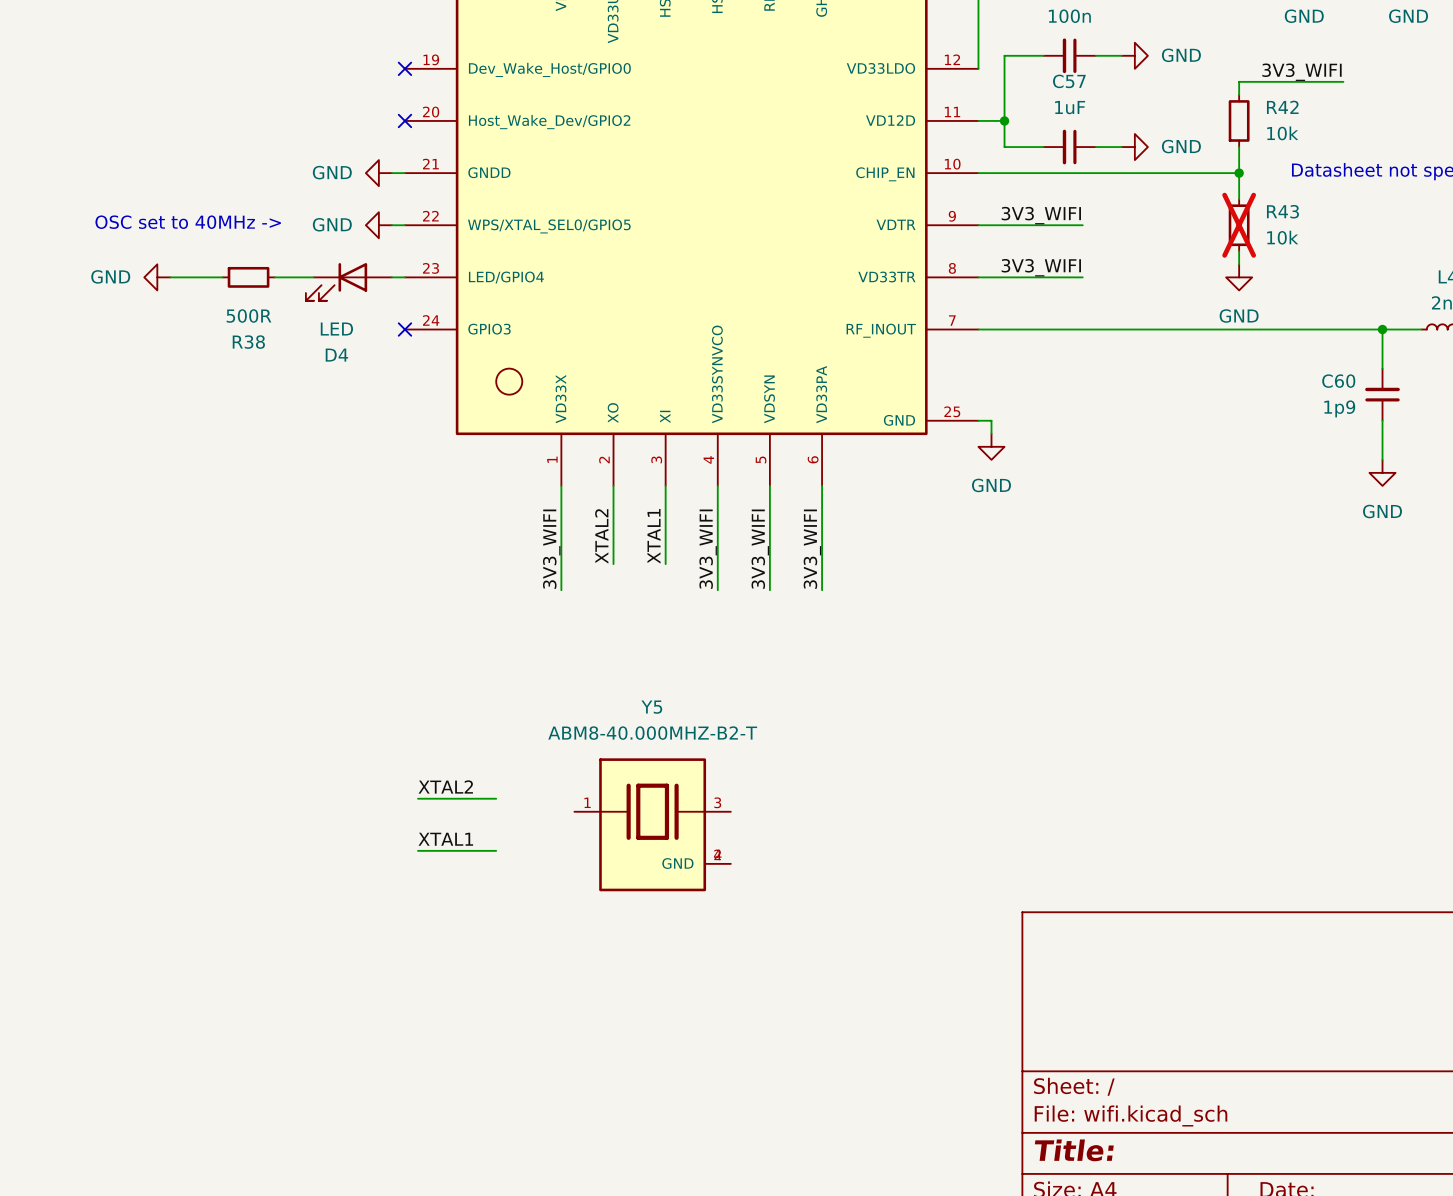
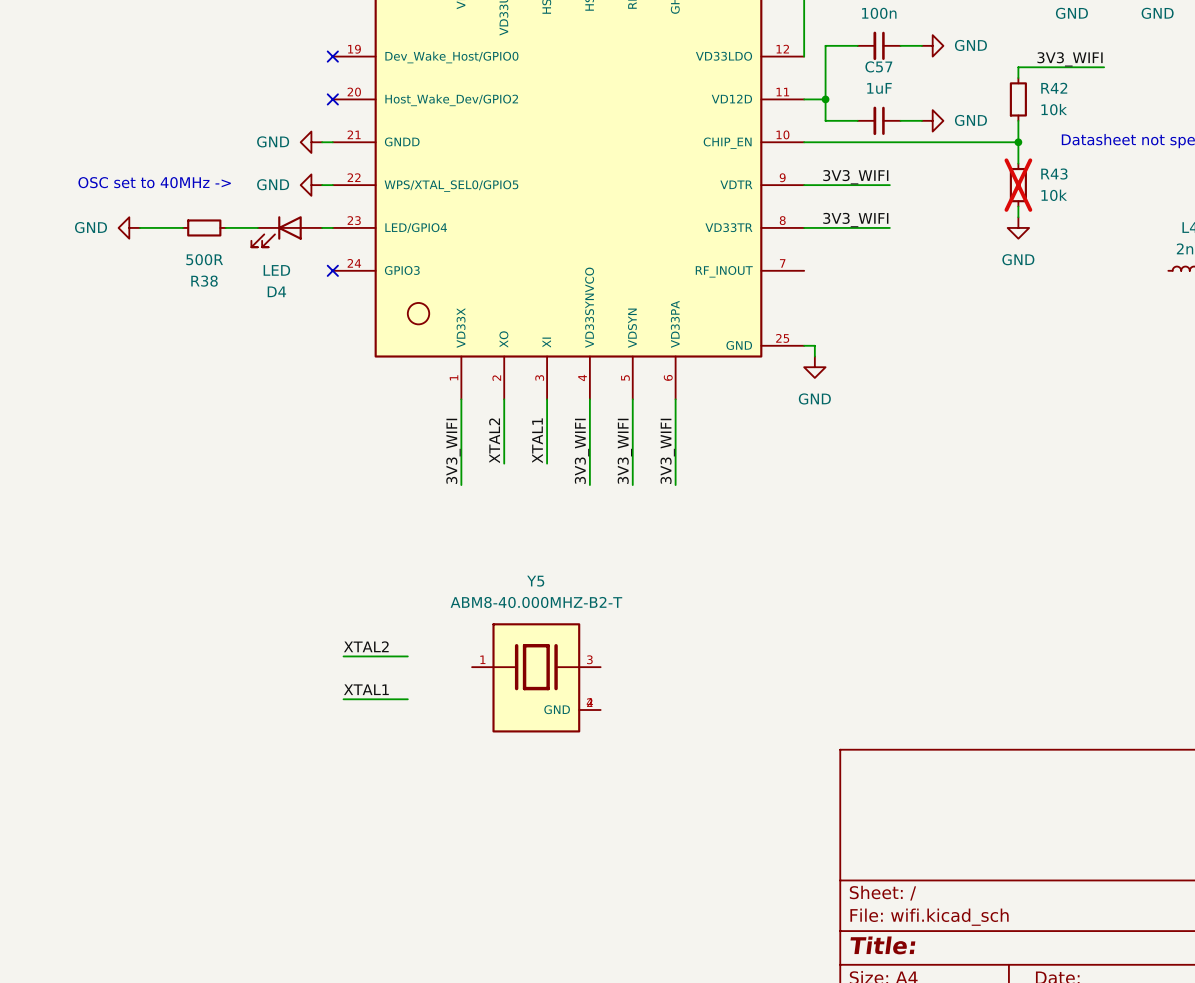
wire: (978, 329) (1421, 329) -> none
wire: (1382, 329) (1382, 368) -> none
junction: (1382, 329) -> none
C60: (1382, 394) -> none
wire: (1382, 420) (1382, 459) -> none
power symbol: GND (1382, 472) -> none

